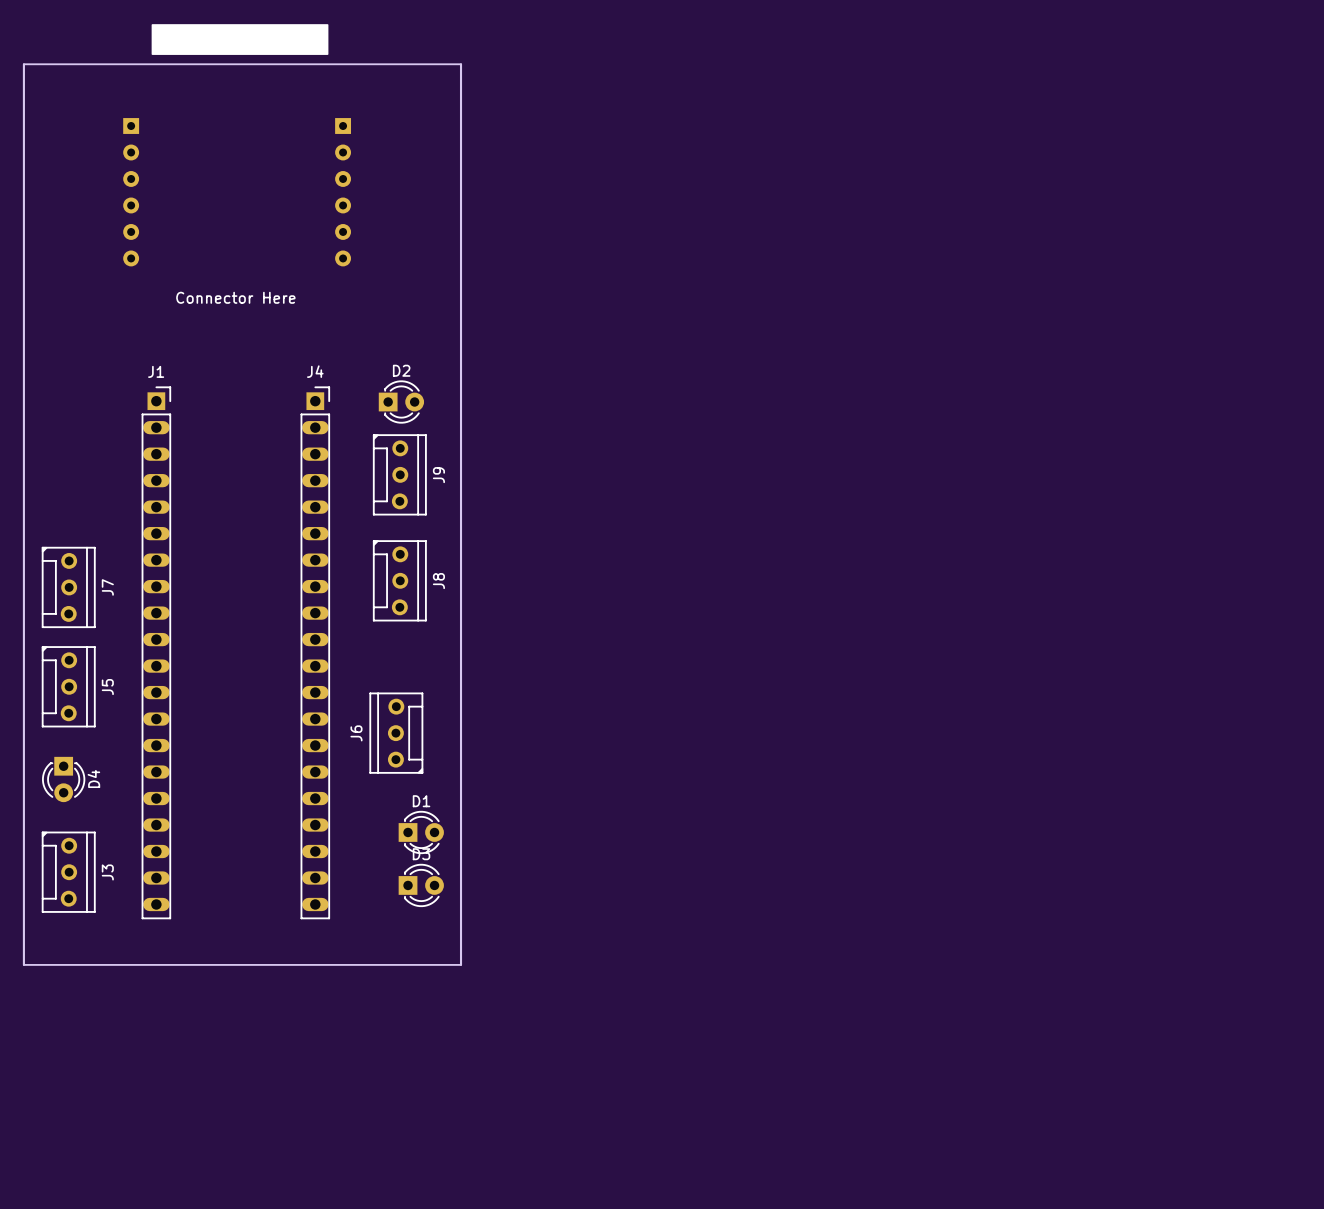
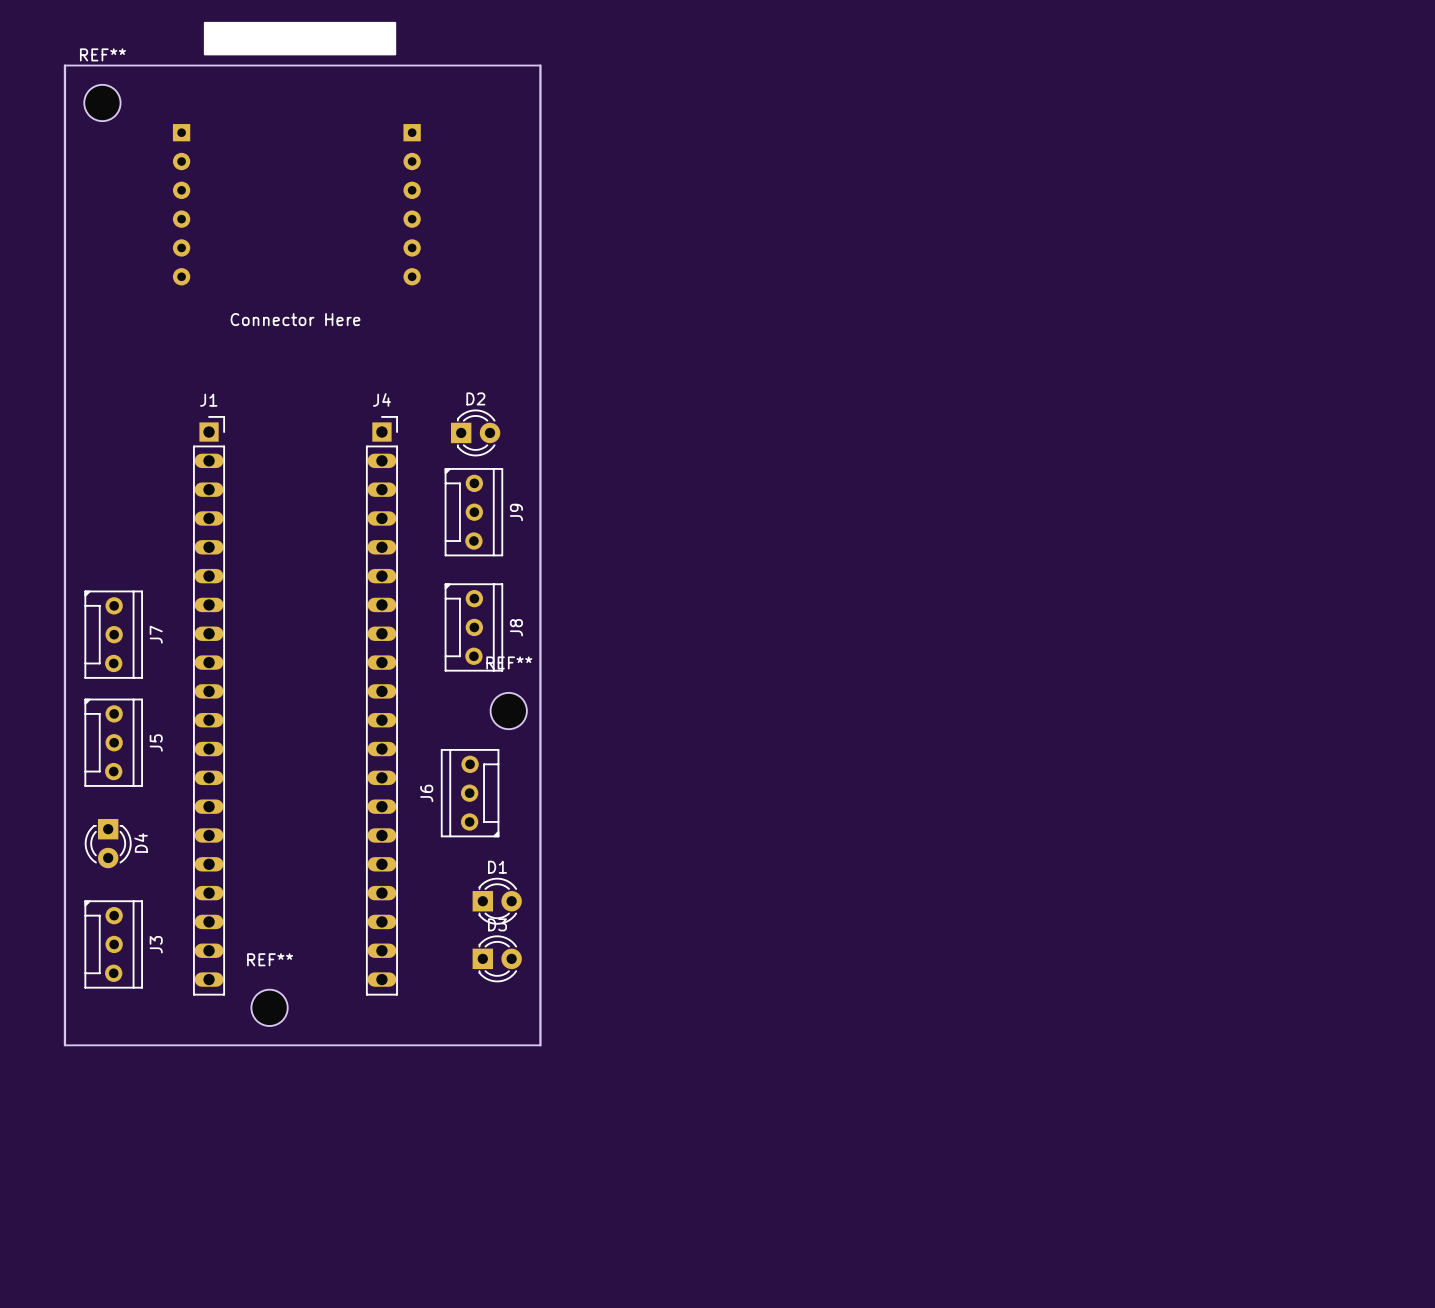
REF**: none -> (102, 102)
REF**: none -> (508, 711)
REF**: none -> (269, 1007)

